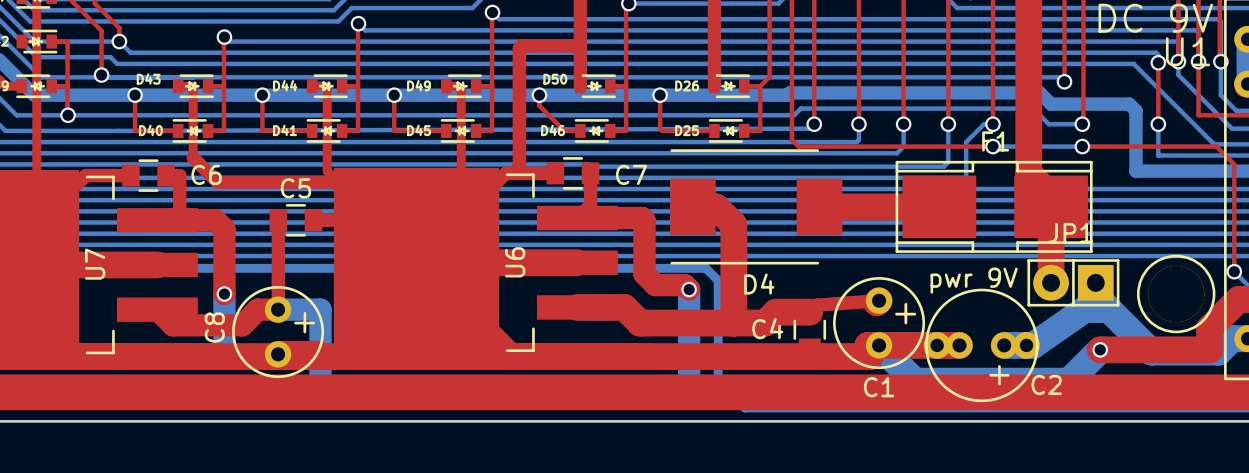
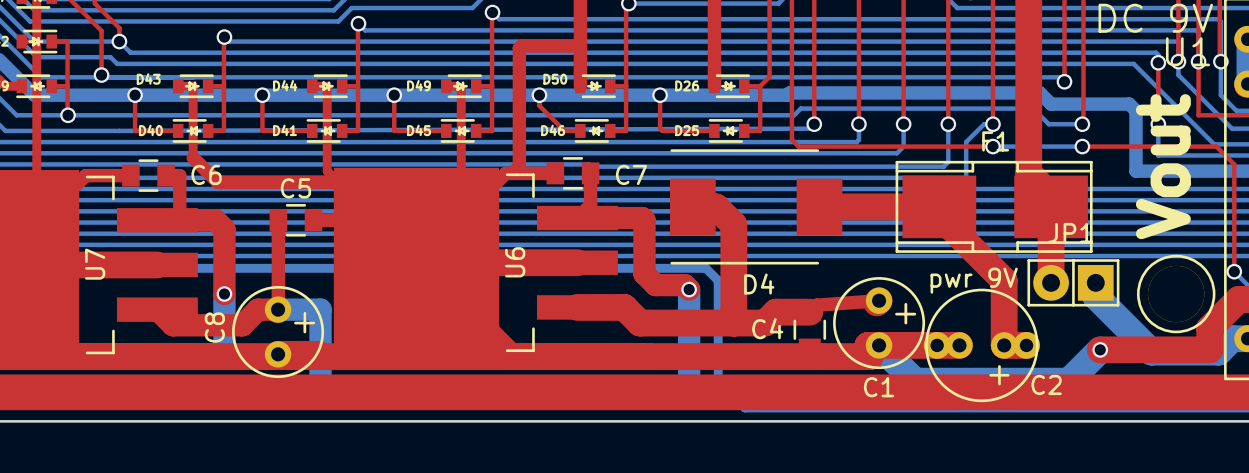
text: none -> Vout (1163, 166)
top track: none -> (939, 206) (939, 215) (1004, 280) (1004, 345) (1026, 345)
bottom track: (1109, 309) (1084, 309) (1033, 345) (1004, 345) -> none

